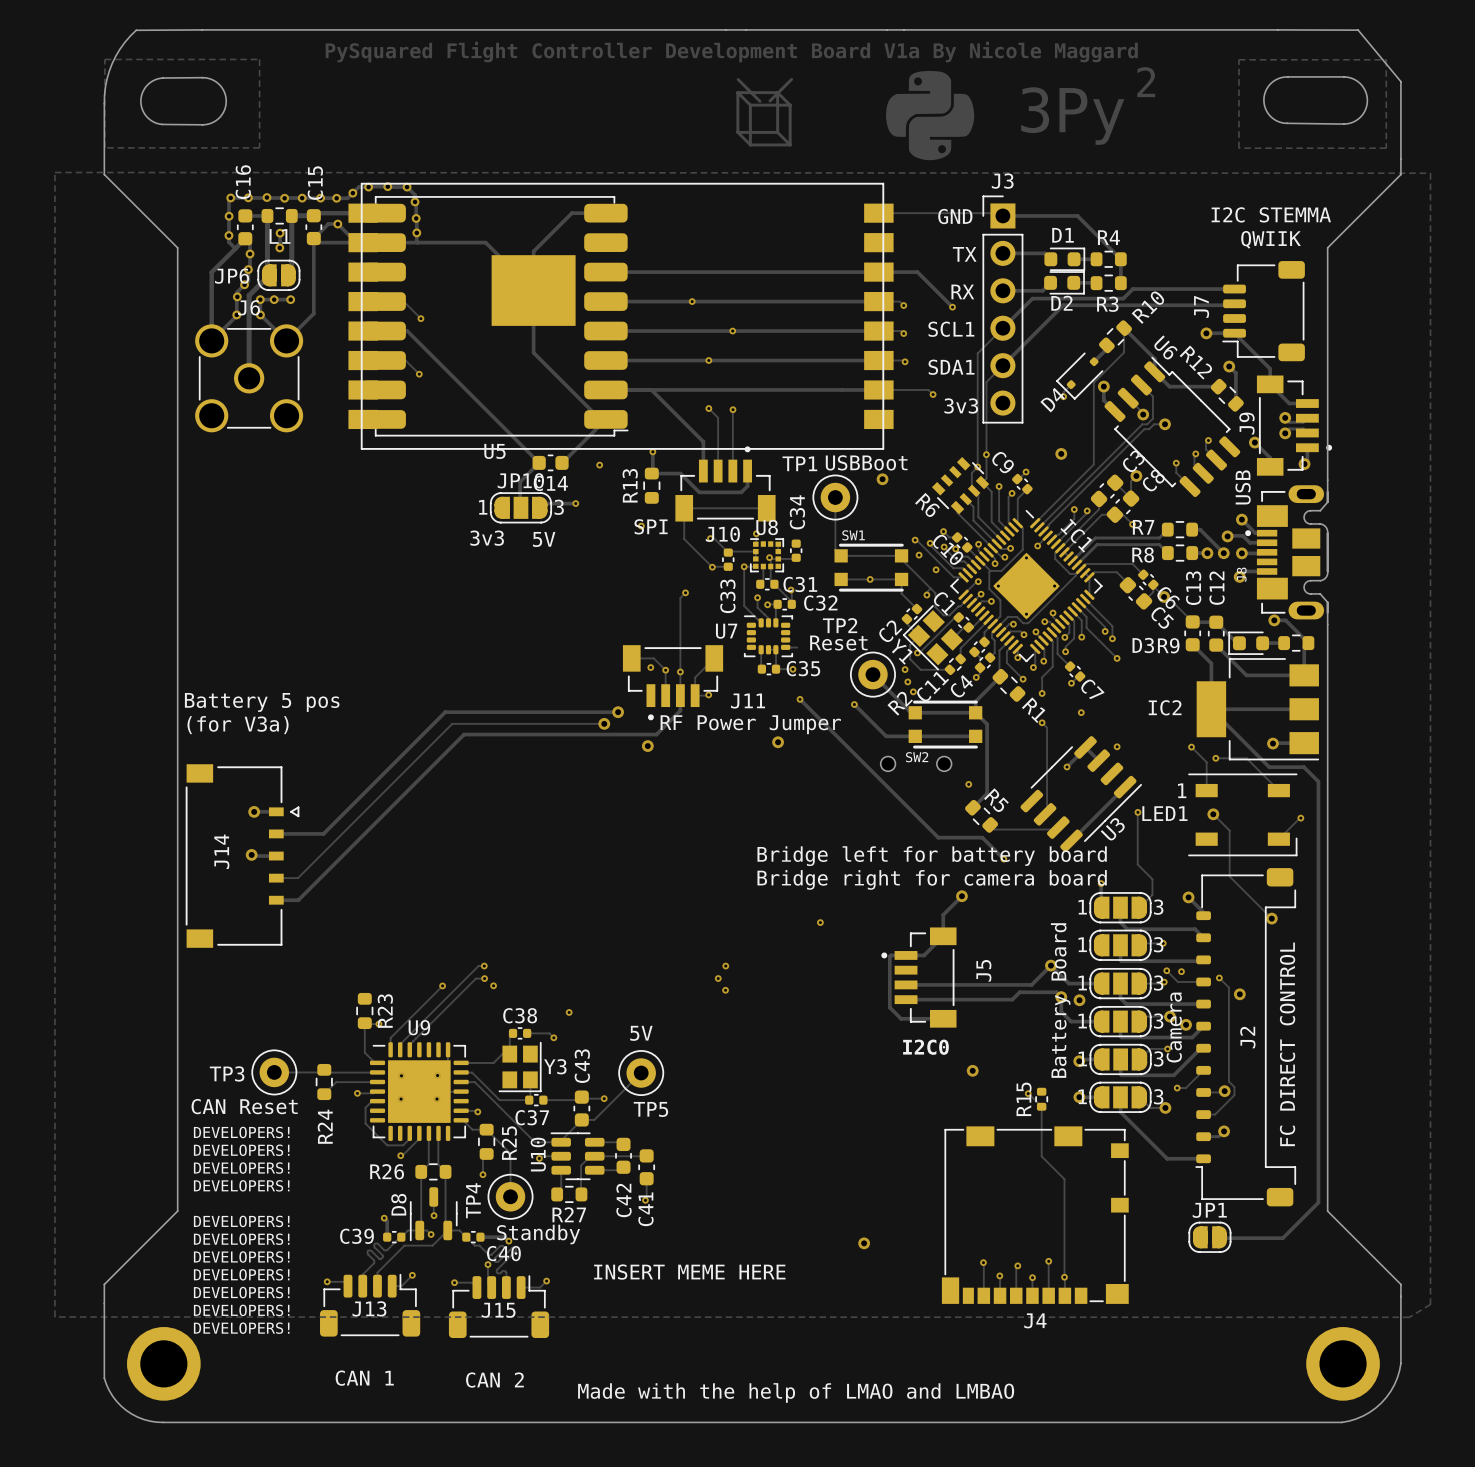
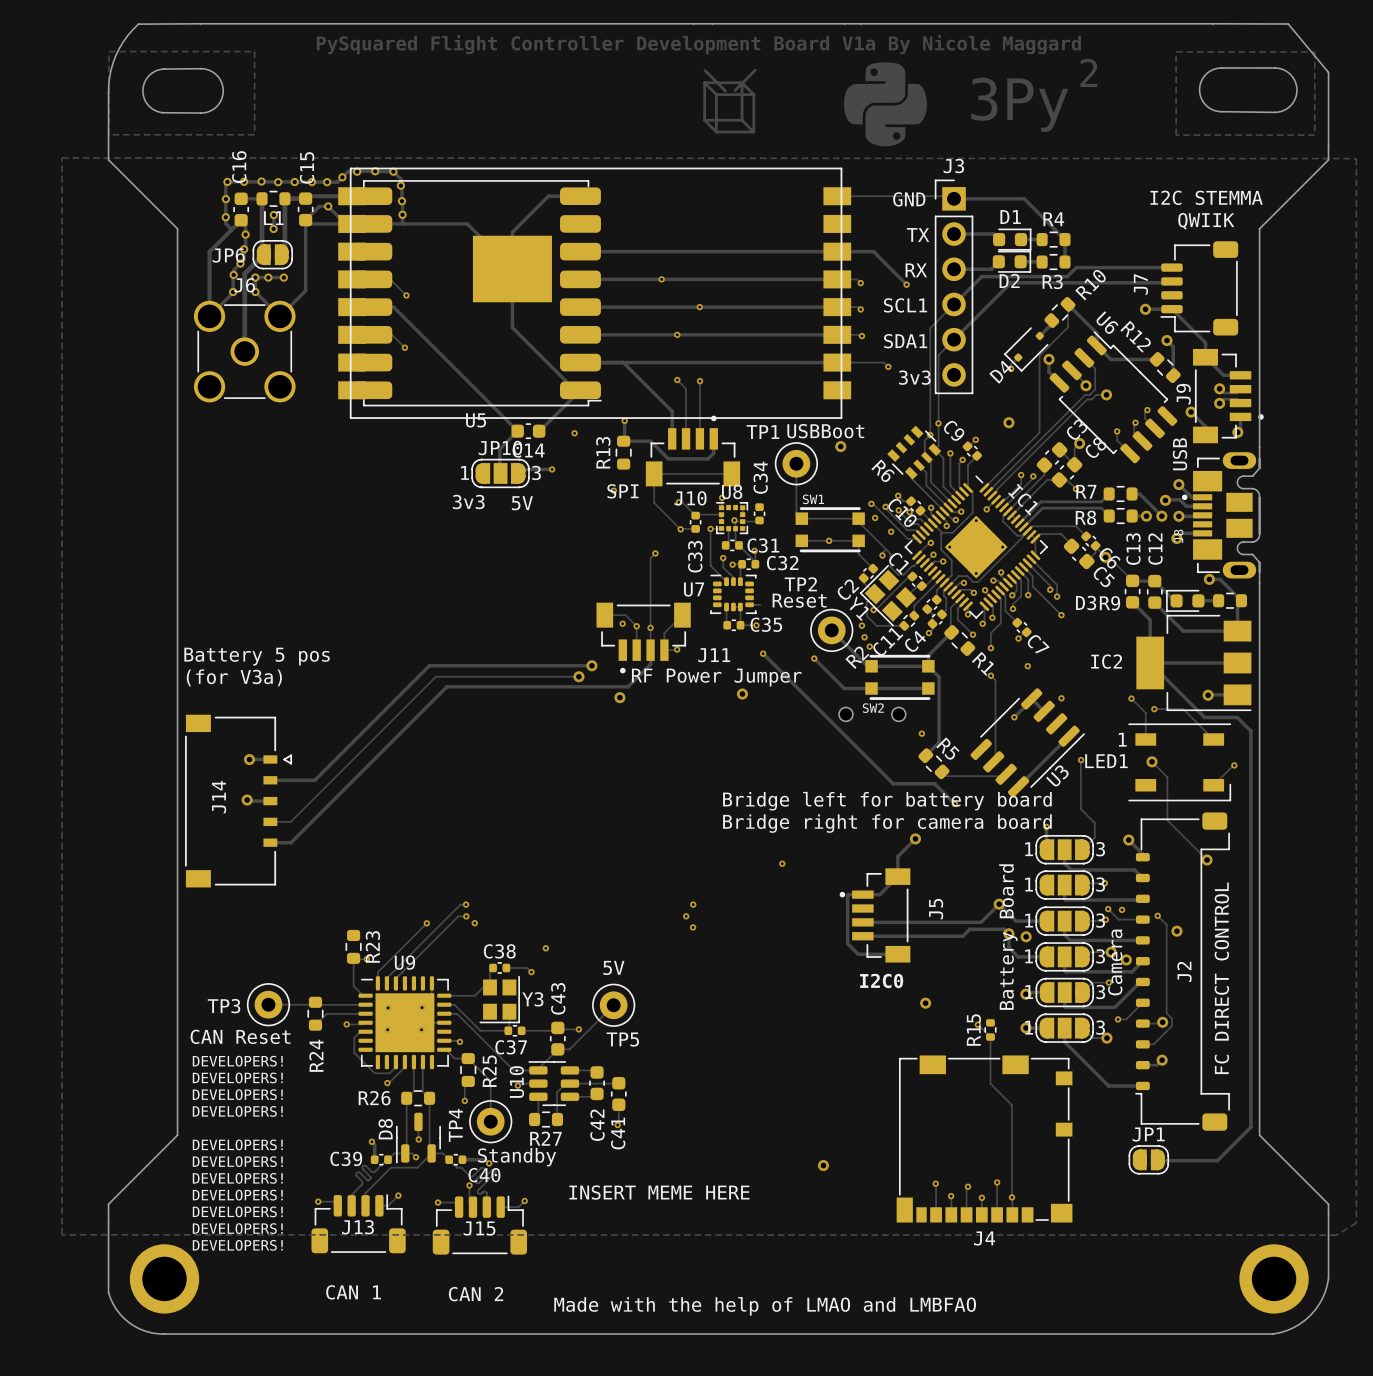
text: Made with the help of LMAO and LMBAO (796, 1392) -> Made with the help of LMAO and LMBFAO (765, 1306)

